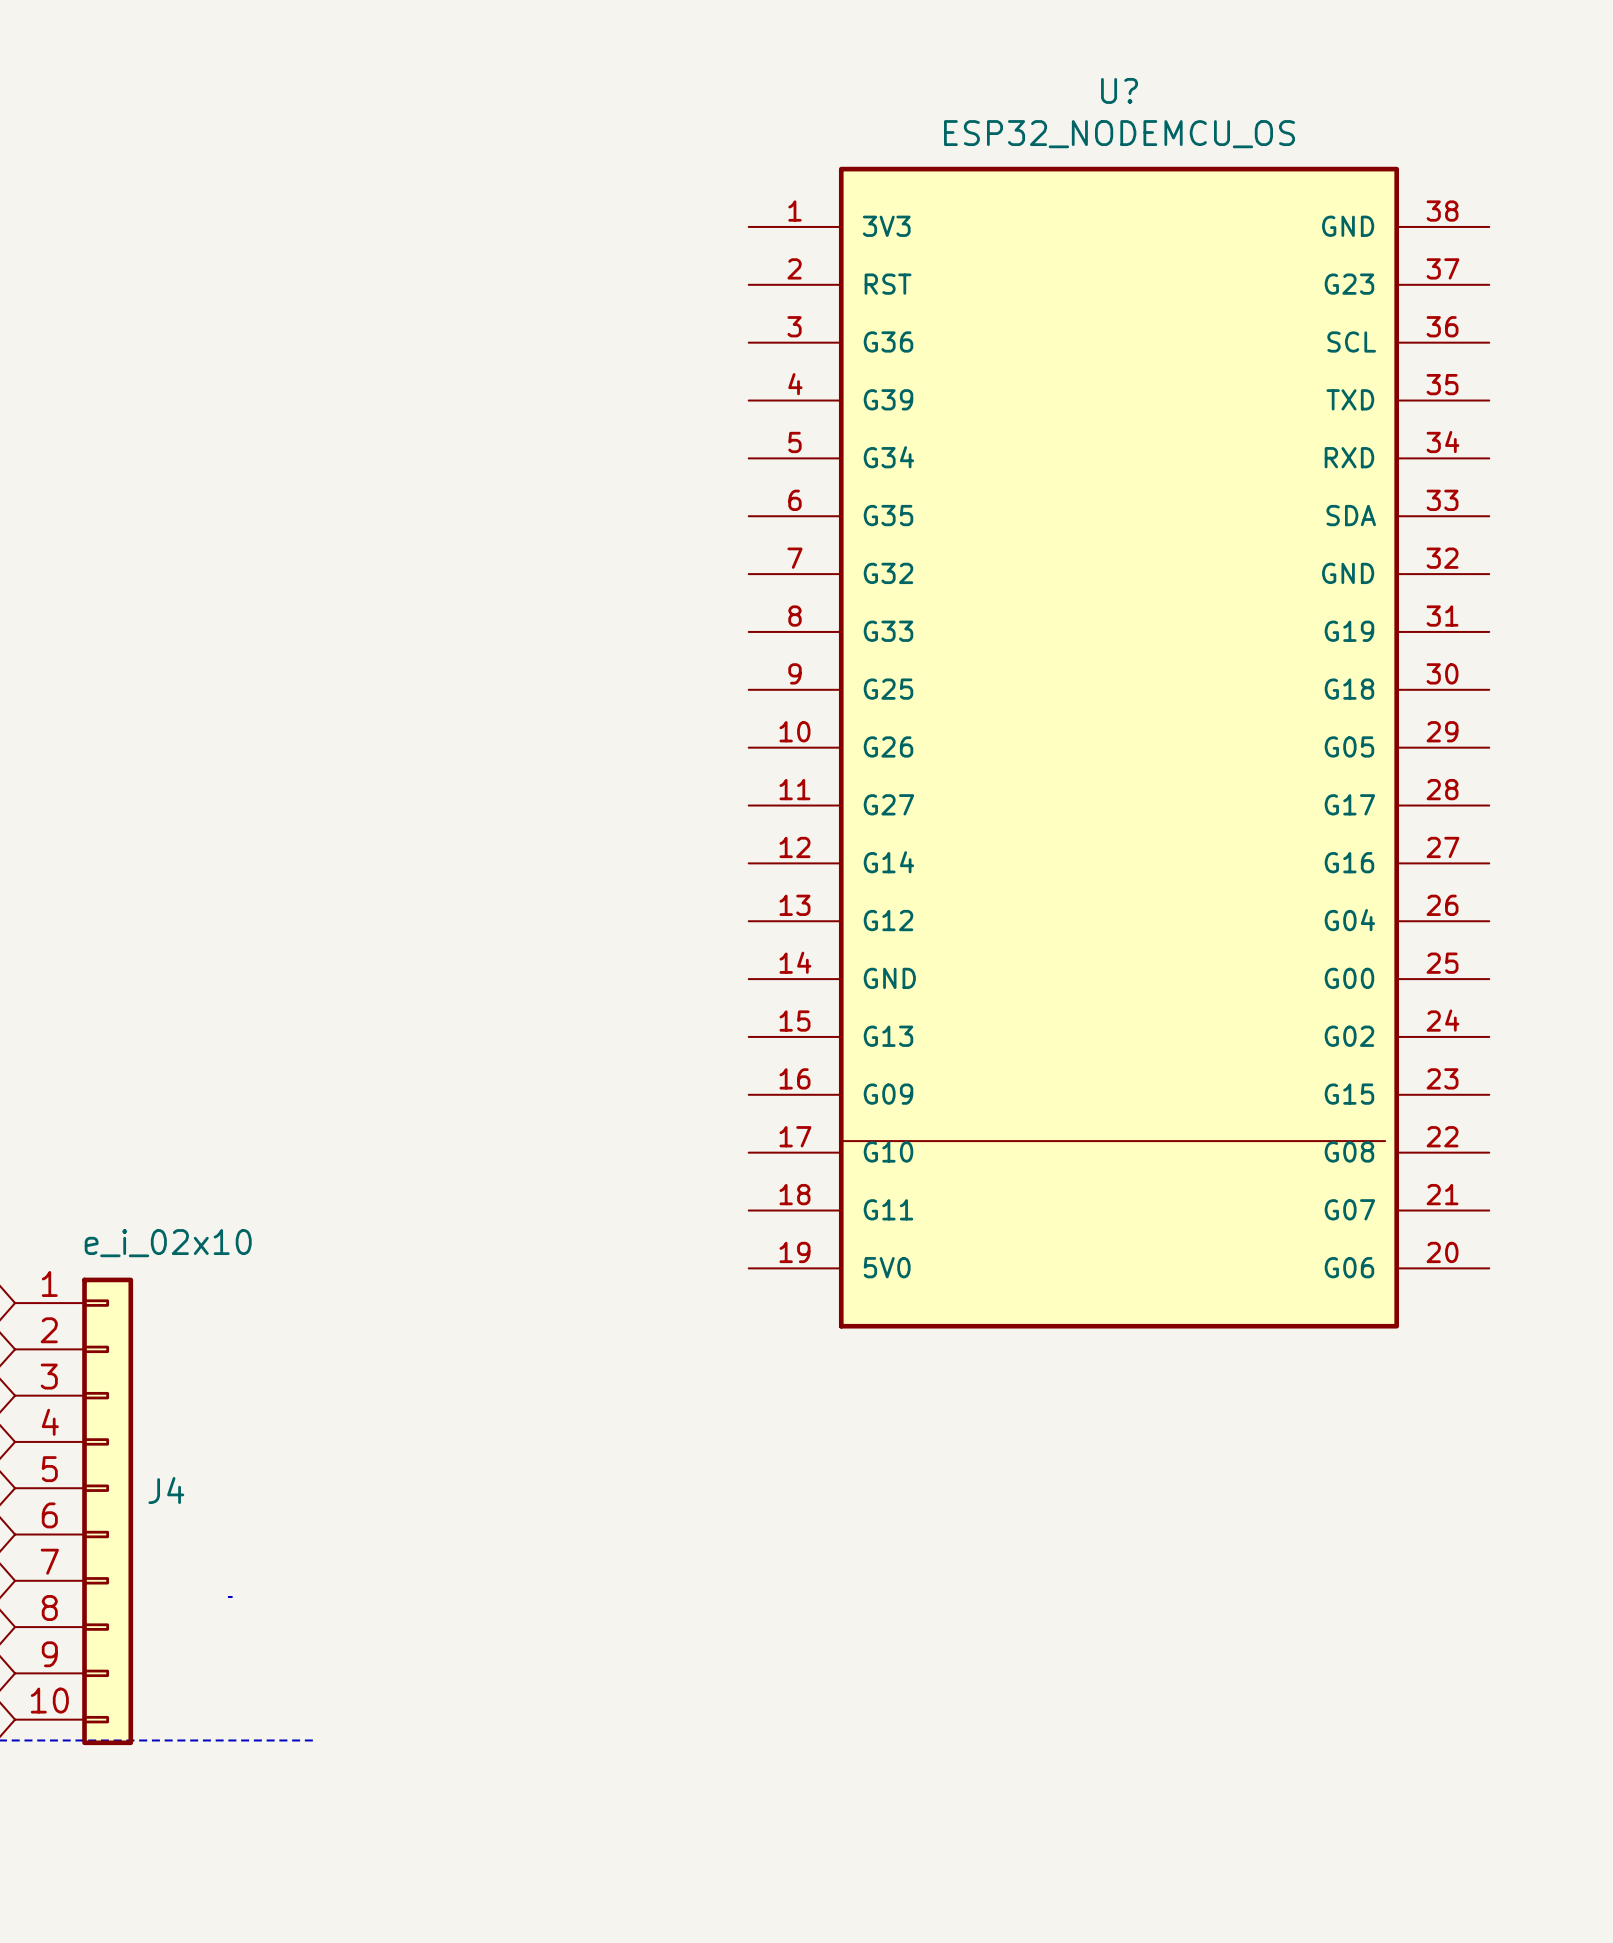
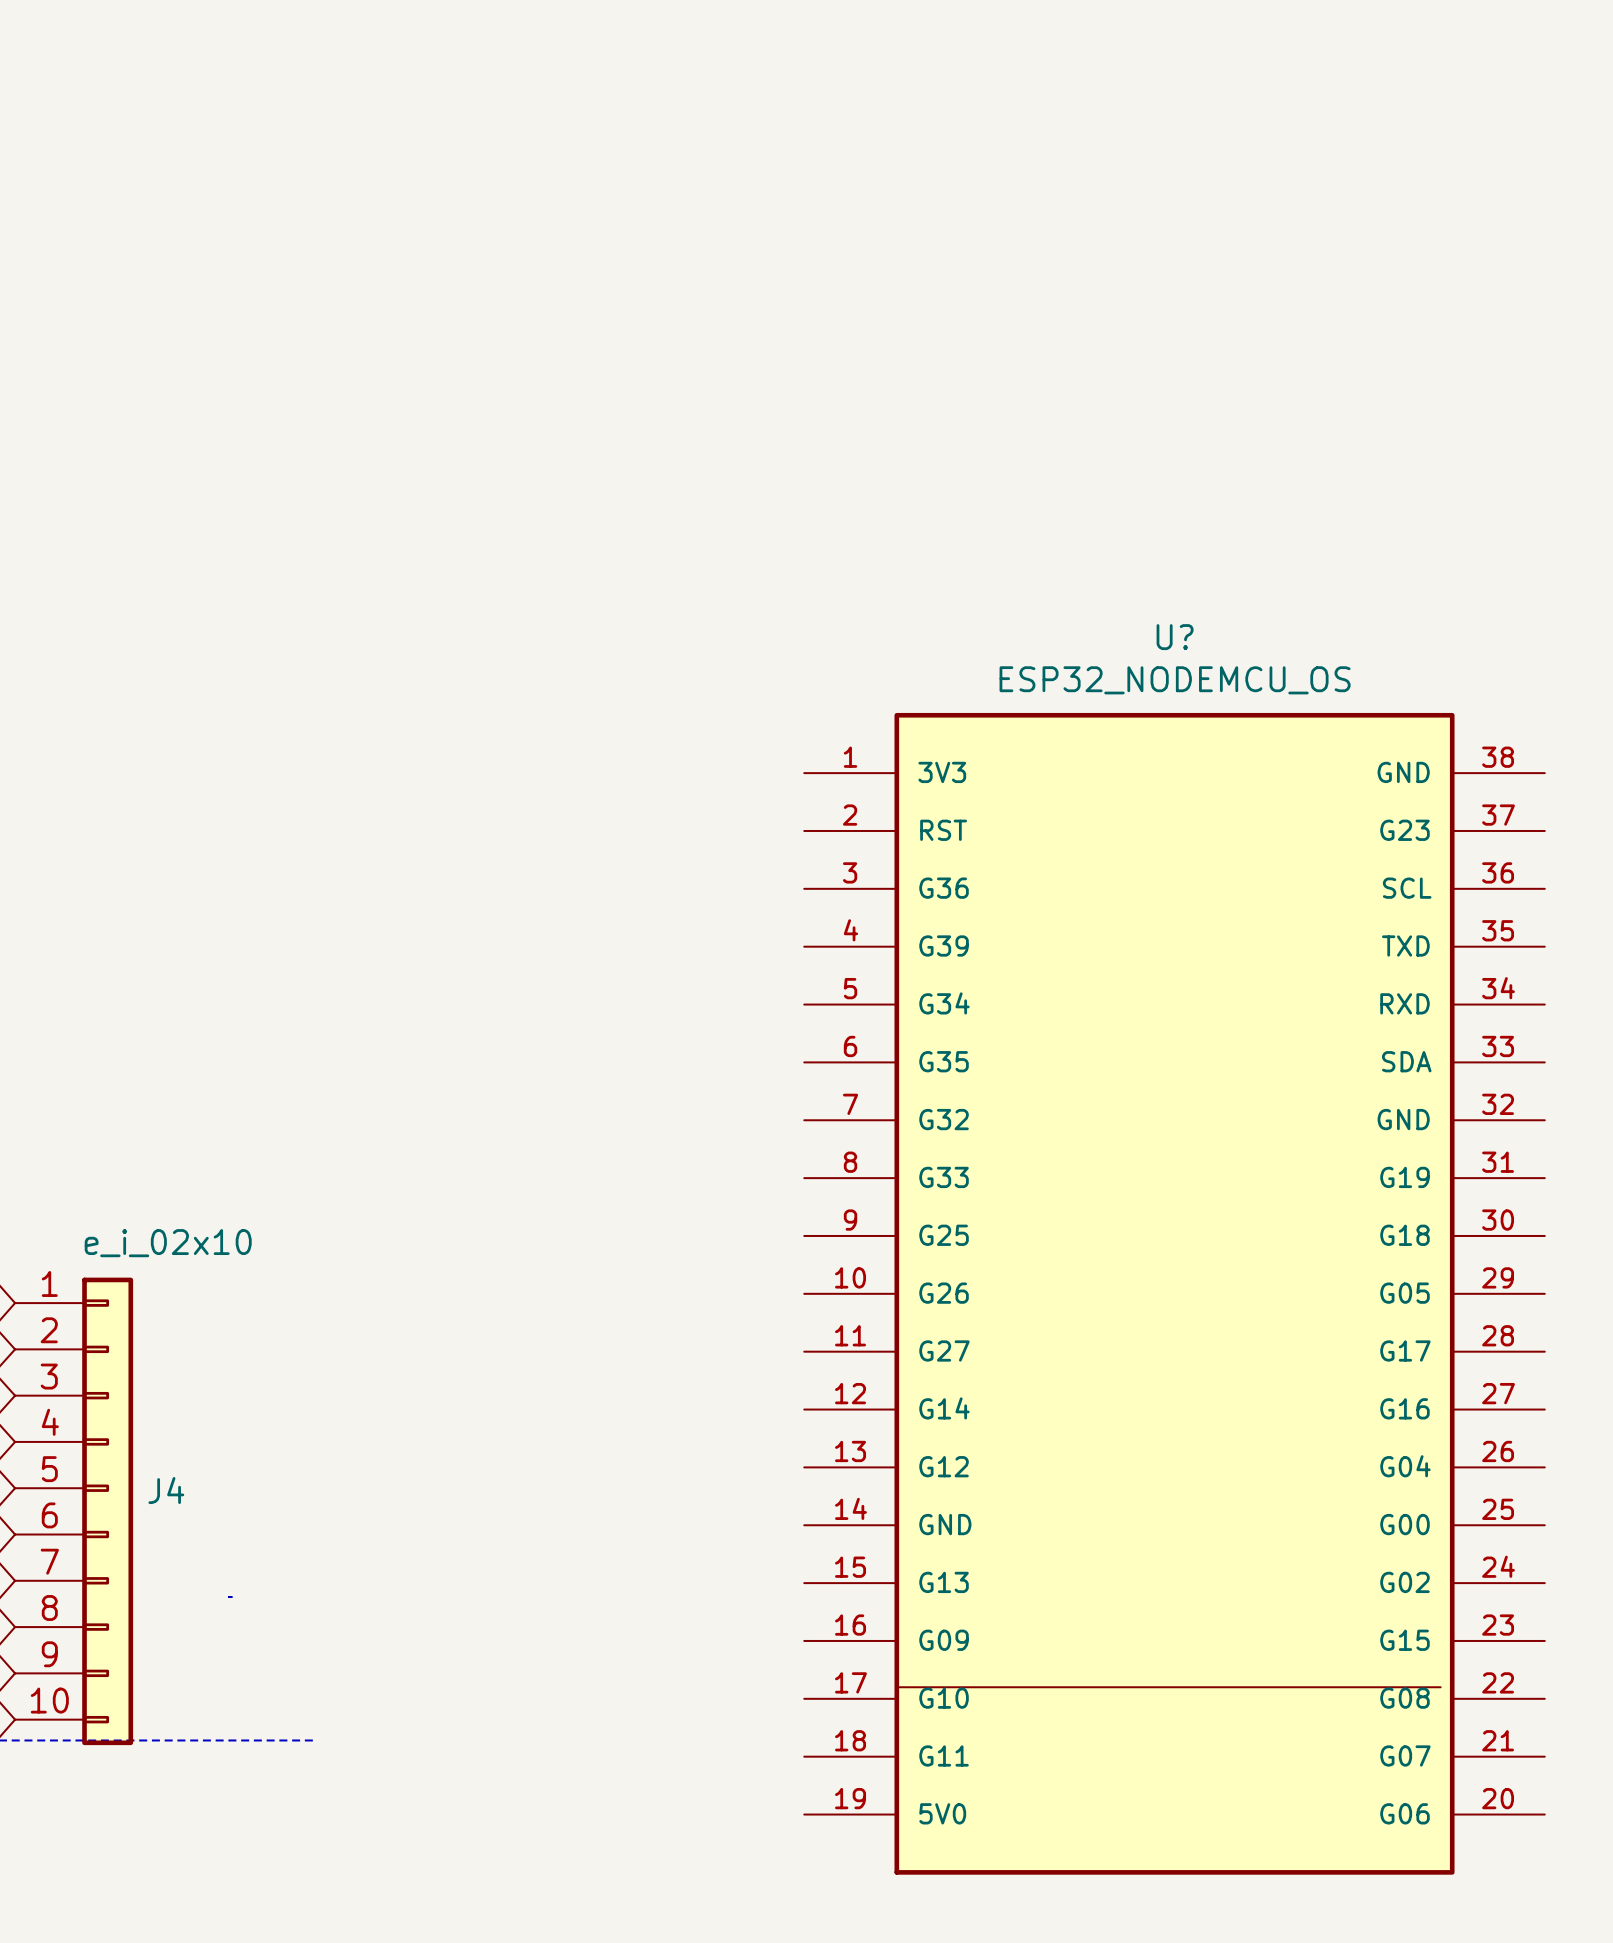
U?: ESP32_NODEMCU_OS (1118, 747) -> none
U?: none -> ESP32_NODEMCU_OS (1174, 1293)

